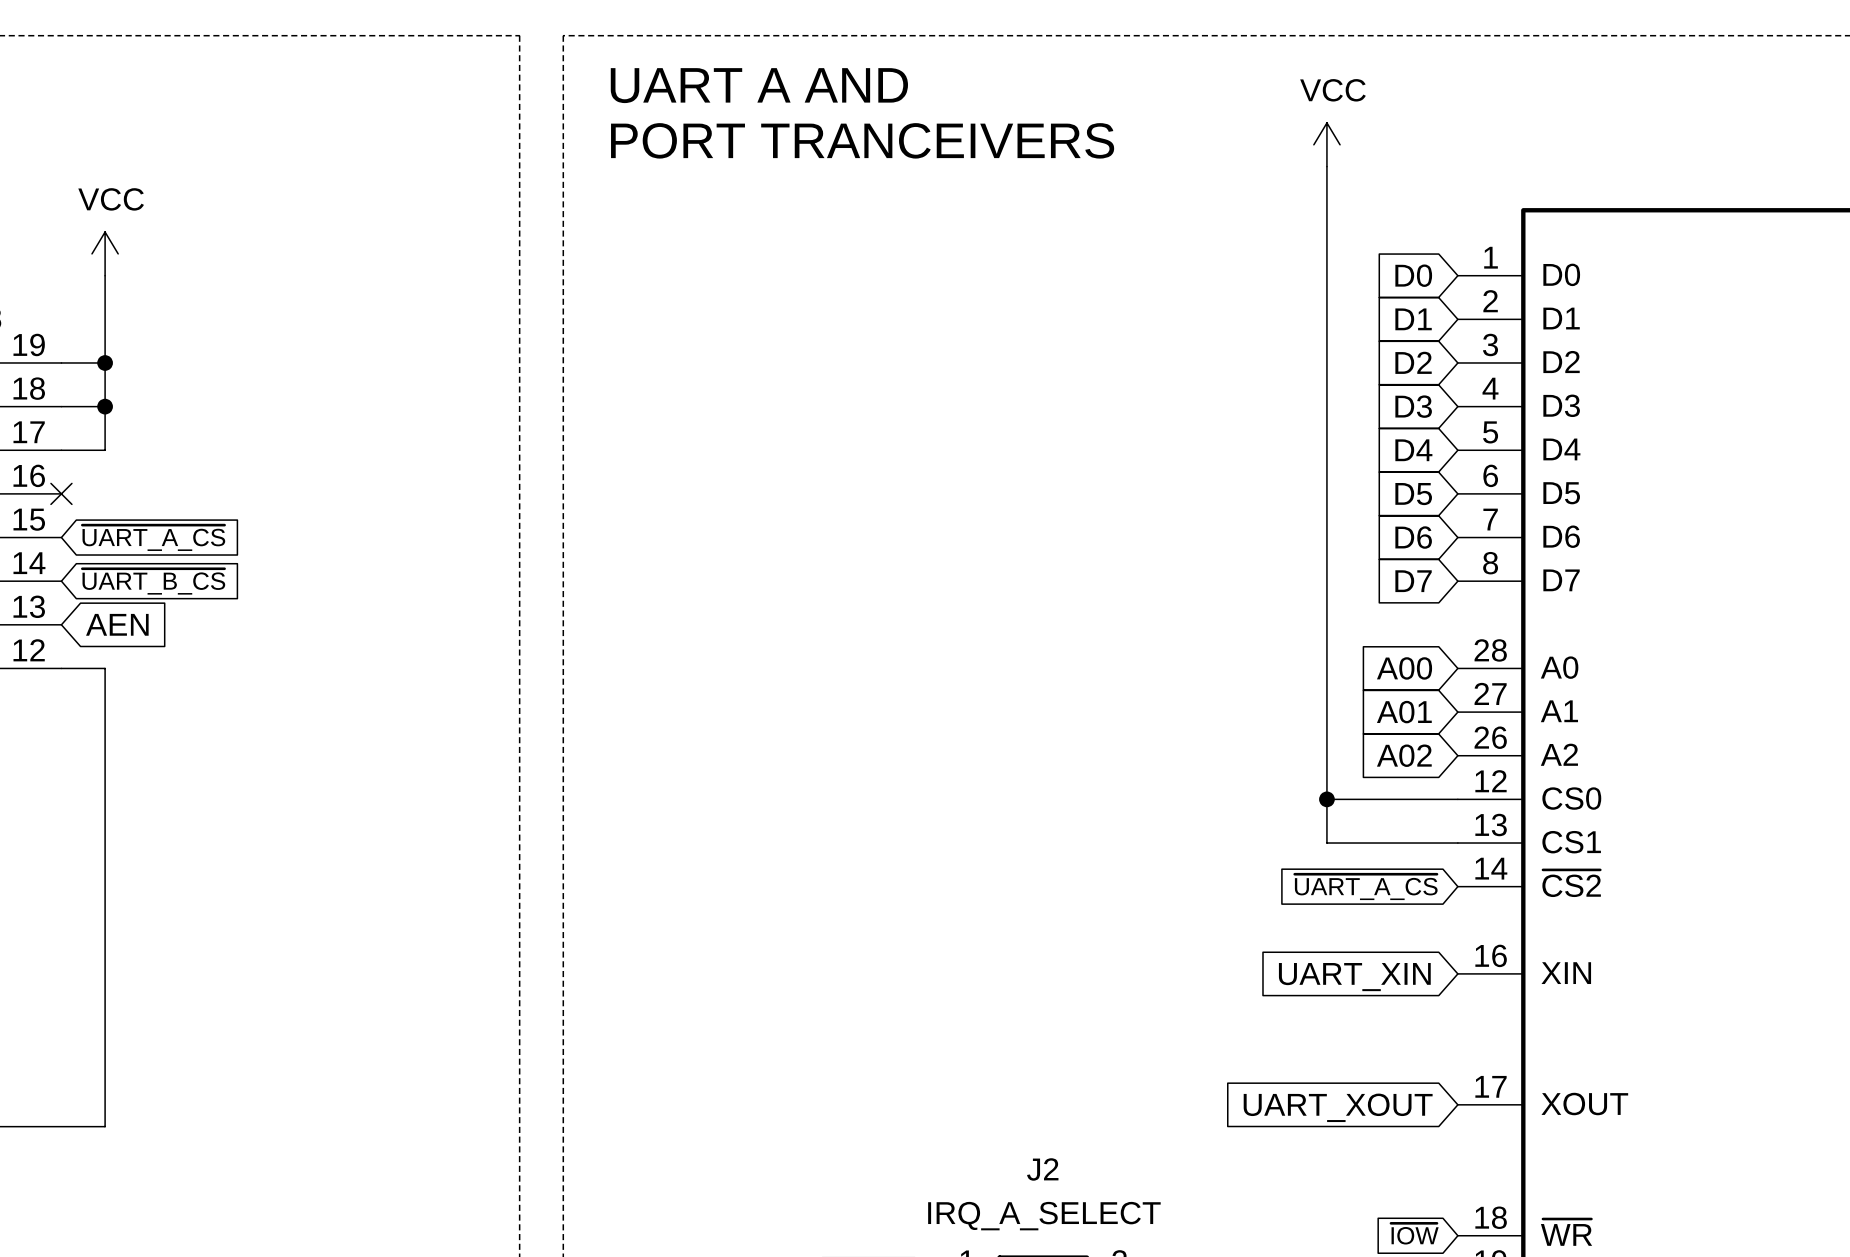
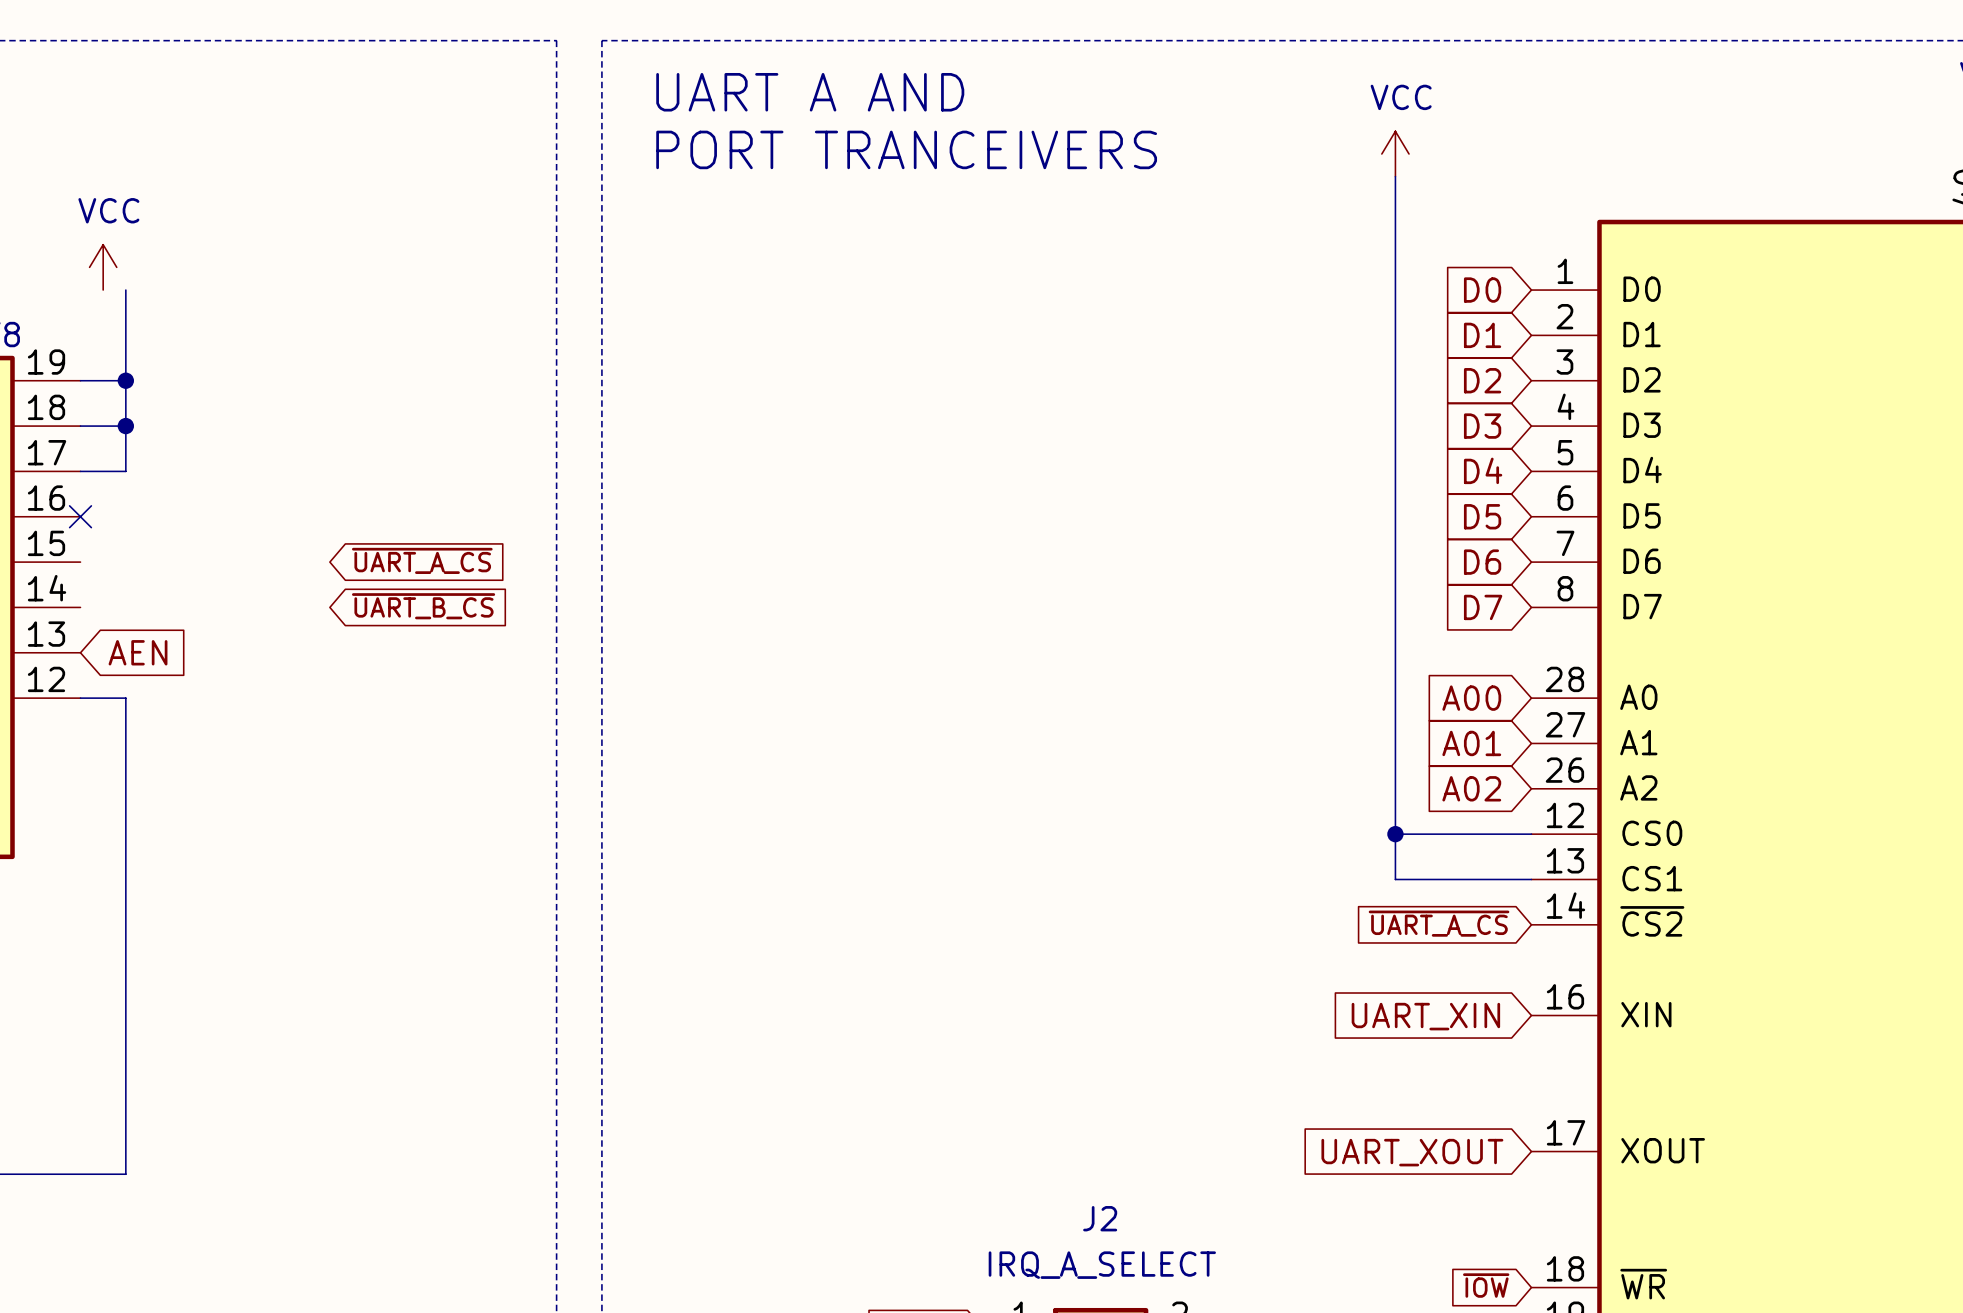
power symbol position: VCC (105, 253) -> VCC (103, 267)
global label position: ~{UART_A_CS} (153, 538) -> ~{UART_A_CS} (422, 560)
global label position: ~{UART_B_CS} (153, 581) -> ~{UART_B_CS} (423, 606)

